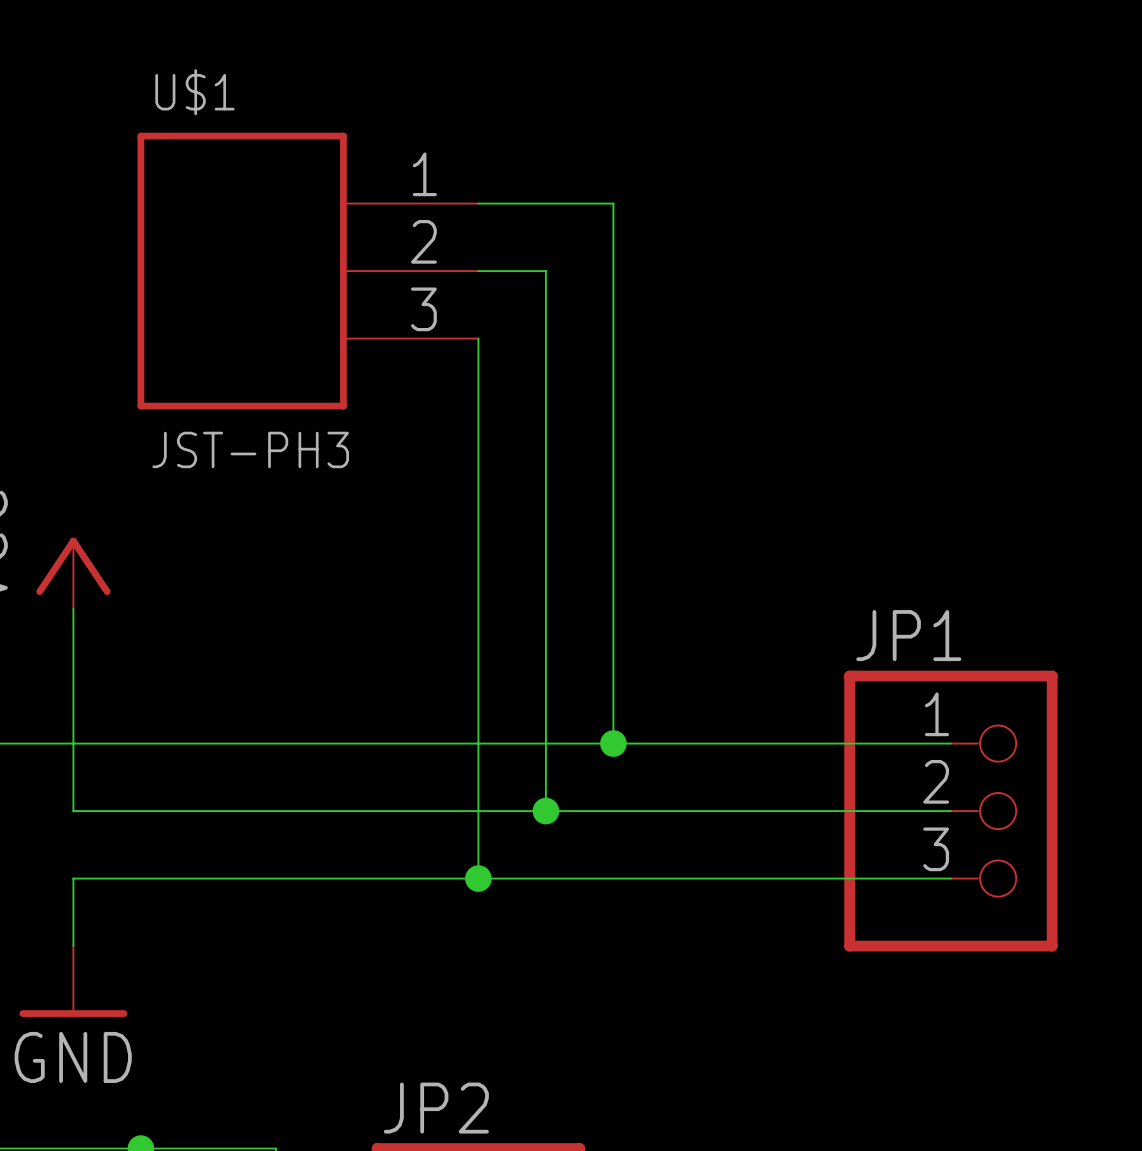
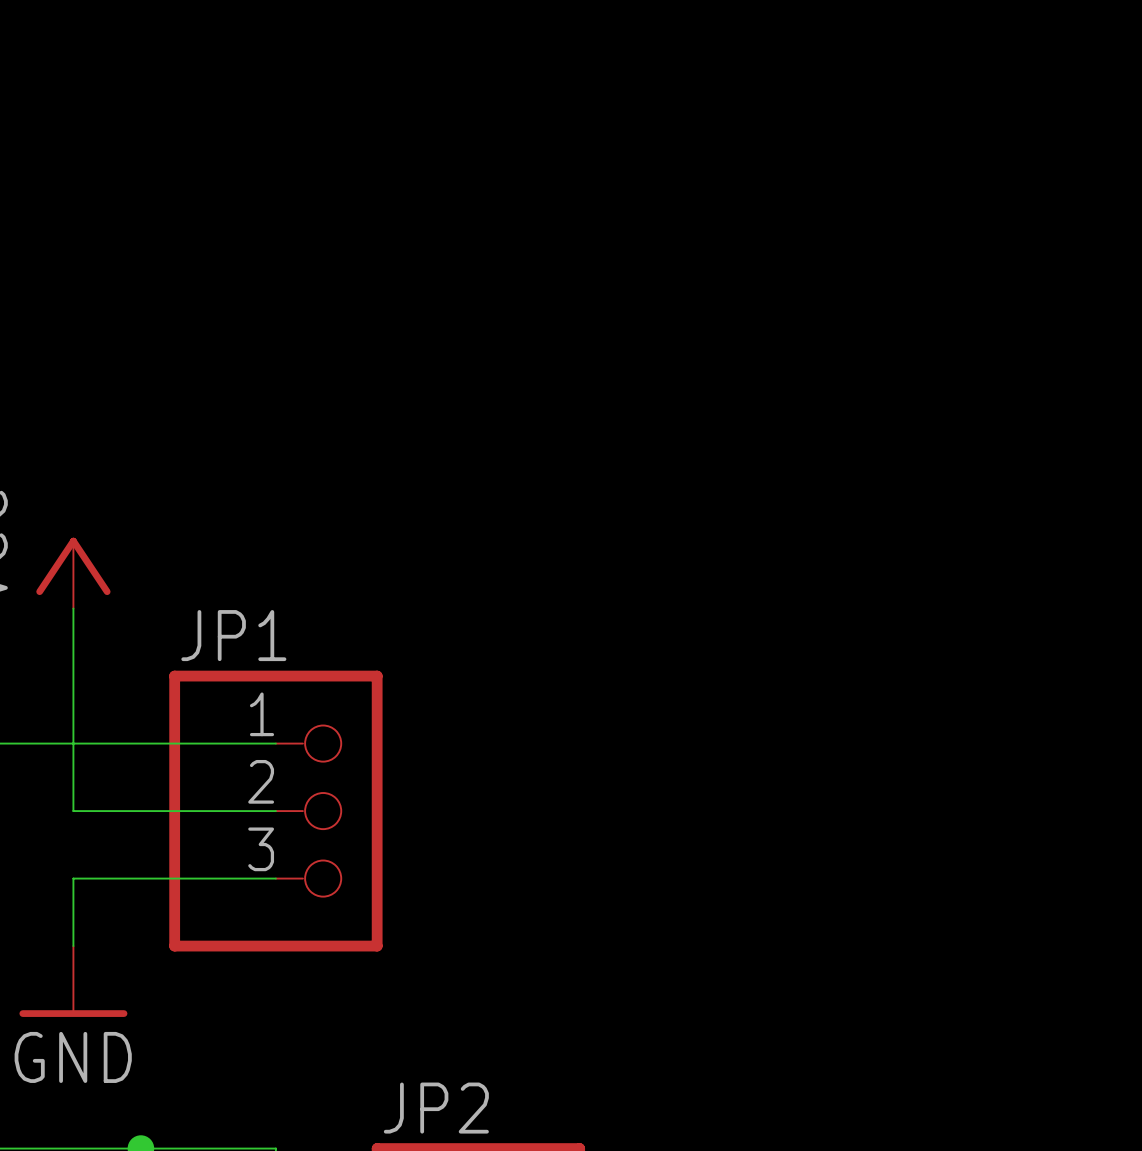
wire: (478, 203) (613, 203) (613, 743) -> none
U$1: JST-PH3 (307, 271) -> none
wire: (478, 271) (545, 271) (545, 811) -> none
wire: (478, 338) (478, 878) -> none
wire: (275, 743) (950, 743) -> none
junction: (613, 743) -> none
wire: (275, 811) (950, 811) -> none
junction: (545, 811) -> none
JP1 position: (950, 811) -> (275, 811)
wire: (275, 878) (950, 878) -> none
junction: (478, 878) -> none

